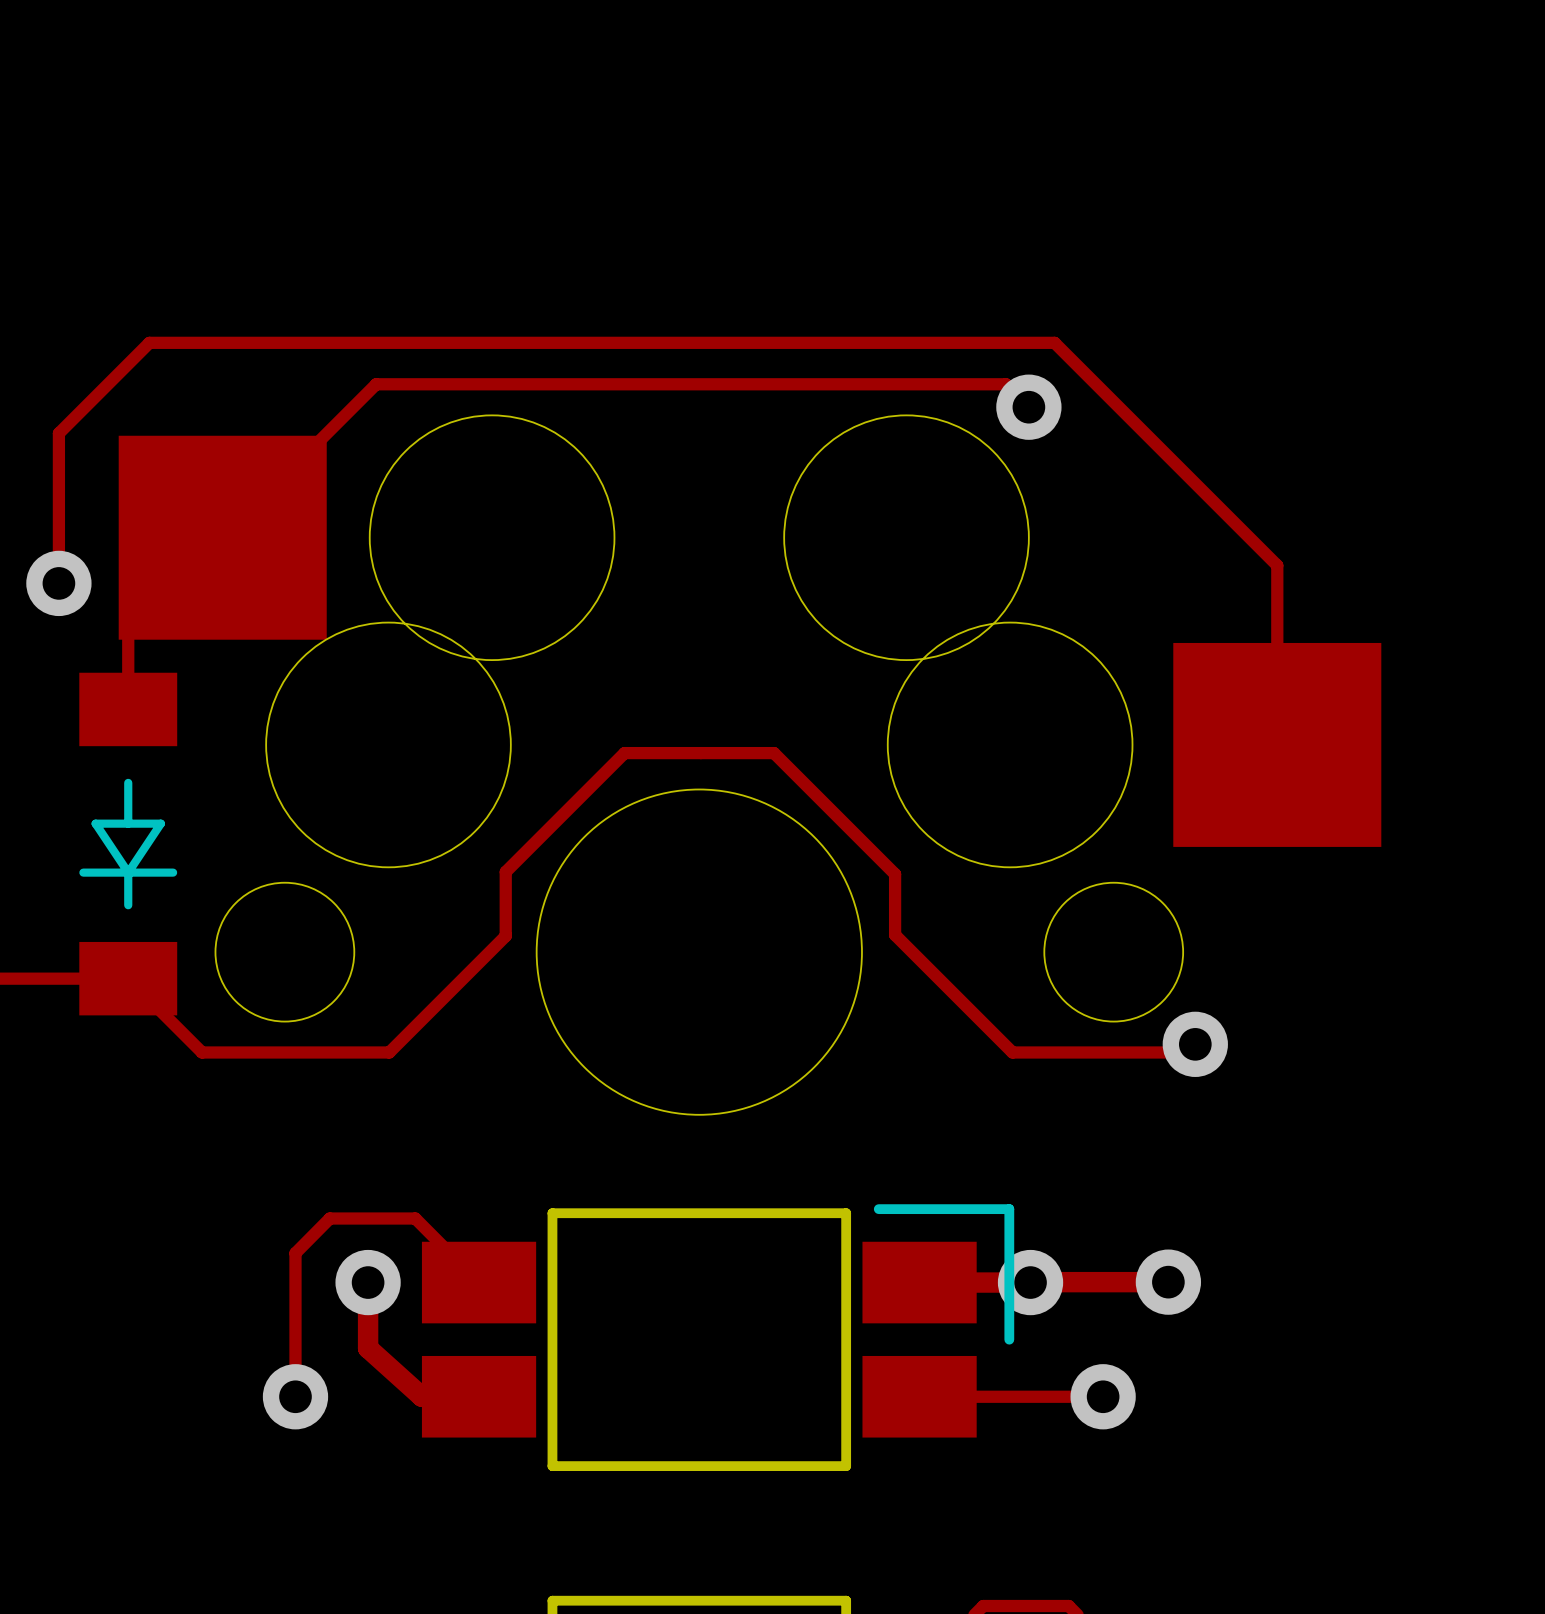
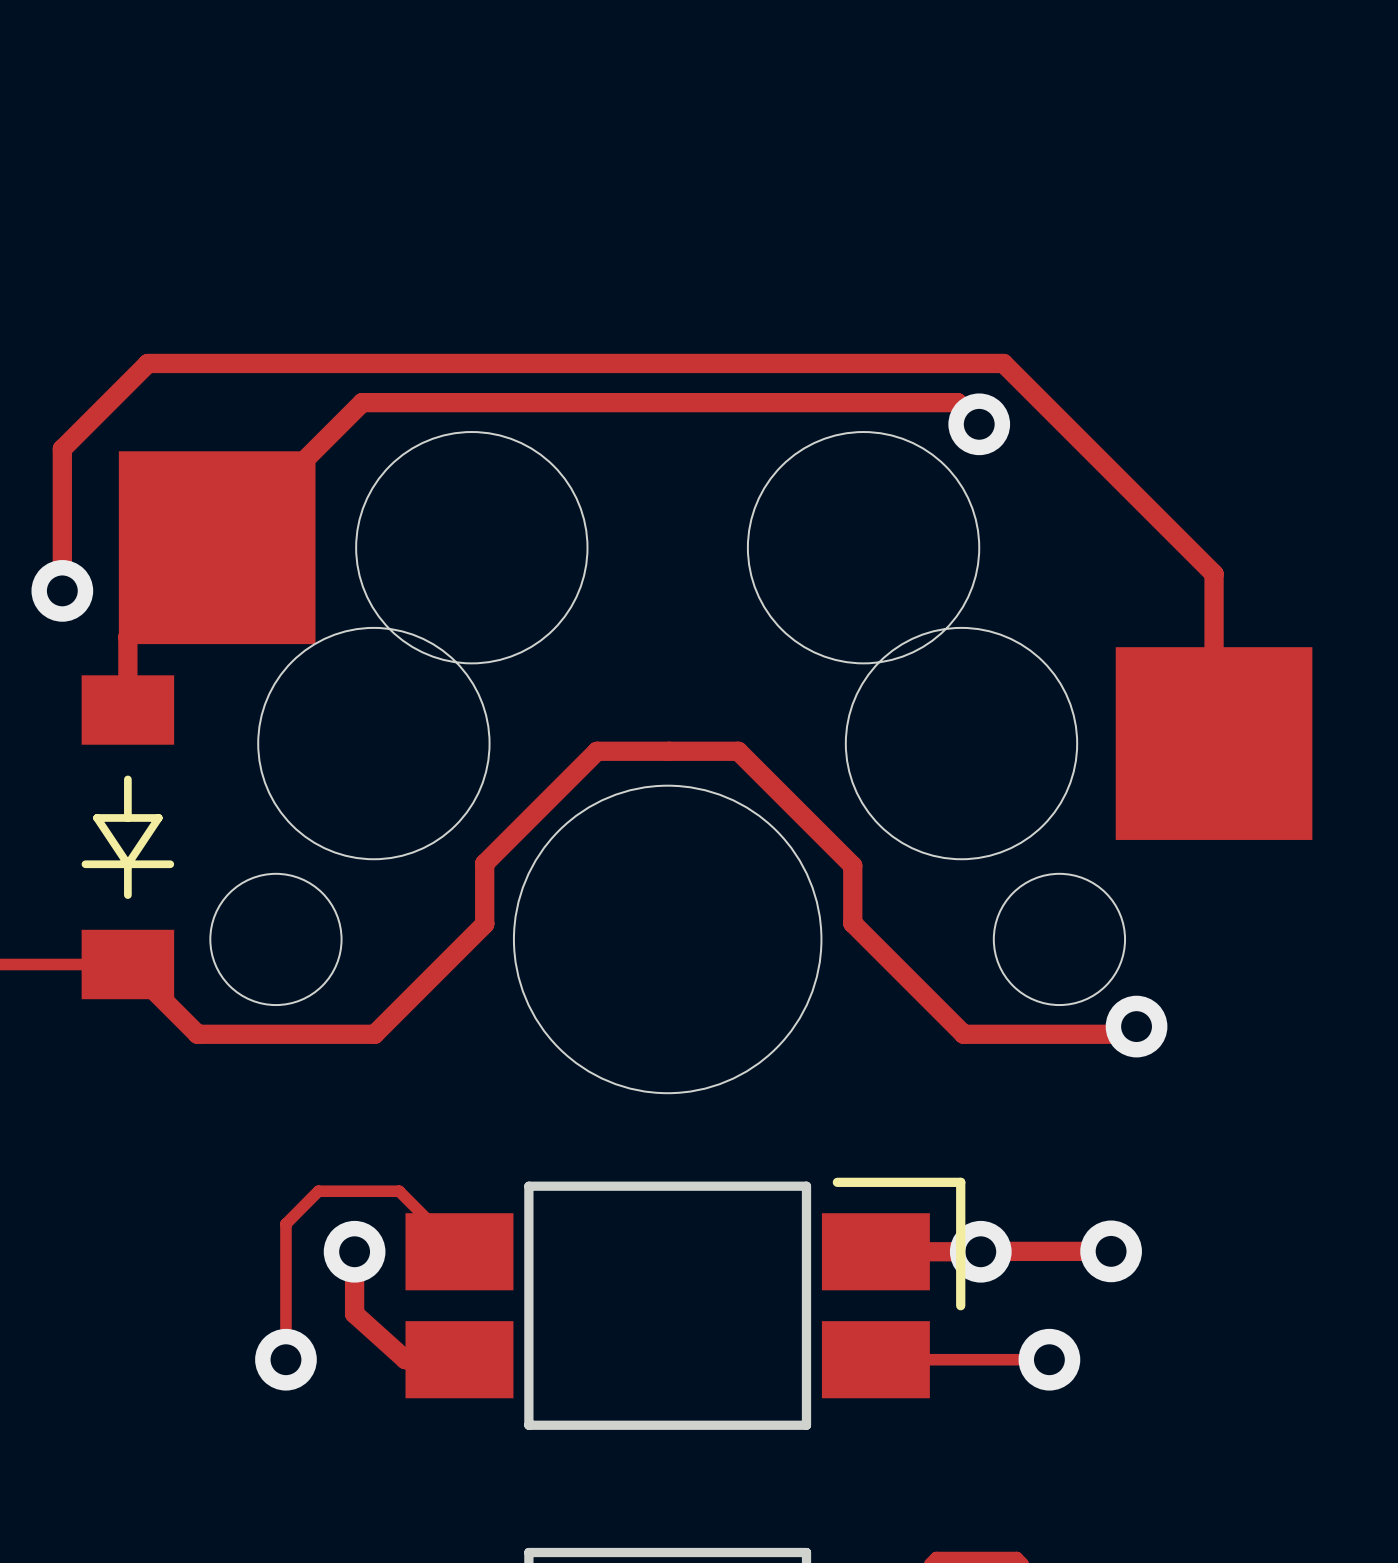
track width: thin (1028, 407) (1005, 384) (376, 384) (128, 632) (128, 709) -> thick (979, 424) (957, 402) (362, 402) (127, 636) (127, 710)
track width: thin (58, 583) (58, 433) (149, 342) (1054, 342) (1277, 565) (1277, 744) -> thick (62, 590) (62, 449) (147, 363) (1003, 363) (1214, 573) (1214, 743)
track width: thin (128, 978) (202, 1052) (389, 1052) (505, 936) (505, 871) (624, 753) (774, 753) (895, 874) (895, 935) (1012, 1052) (1187, 1052) (1195, 1044) -> thick (127, 964) (197, 1034) (374, 1034) (484, 924) (484, 863) (597, 751) (738, 751) (852, 865) (852, 923) (963, 1034) (1128, 1034) (1136, 1026)

